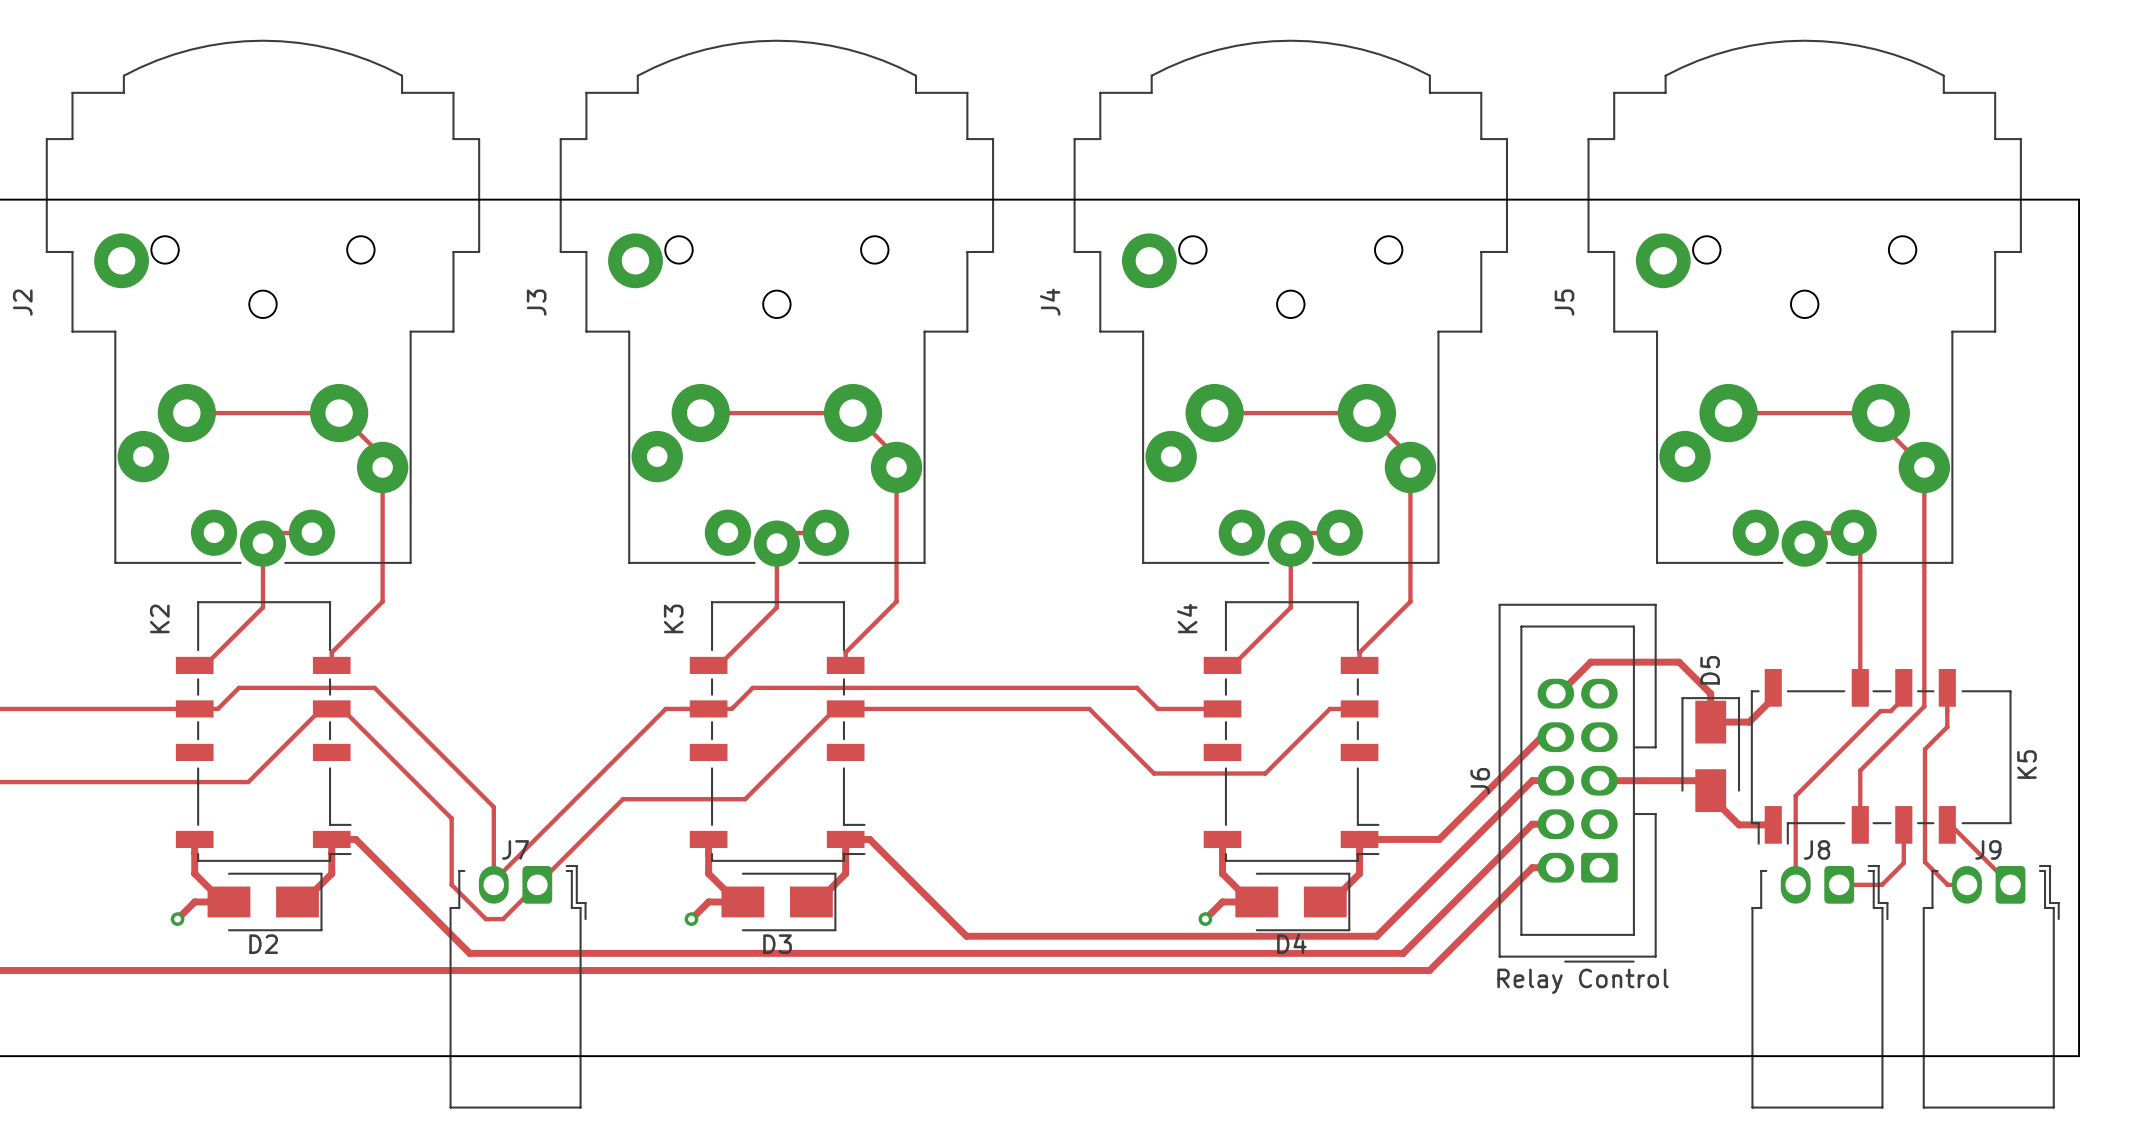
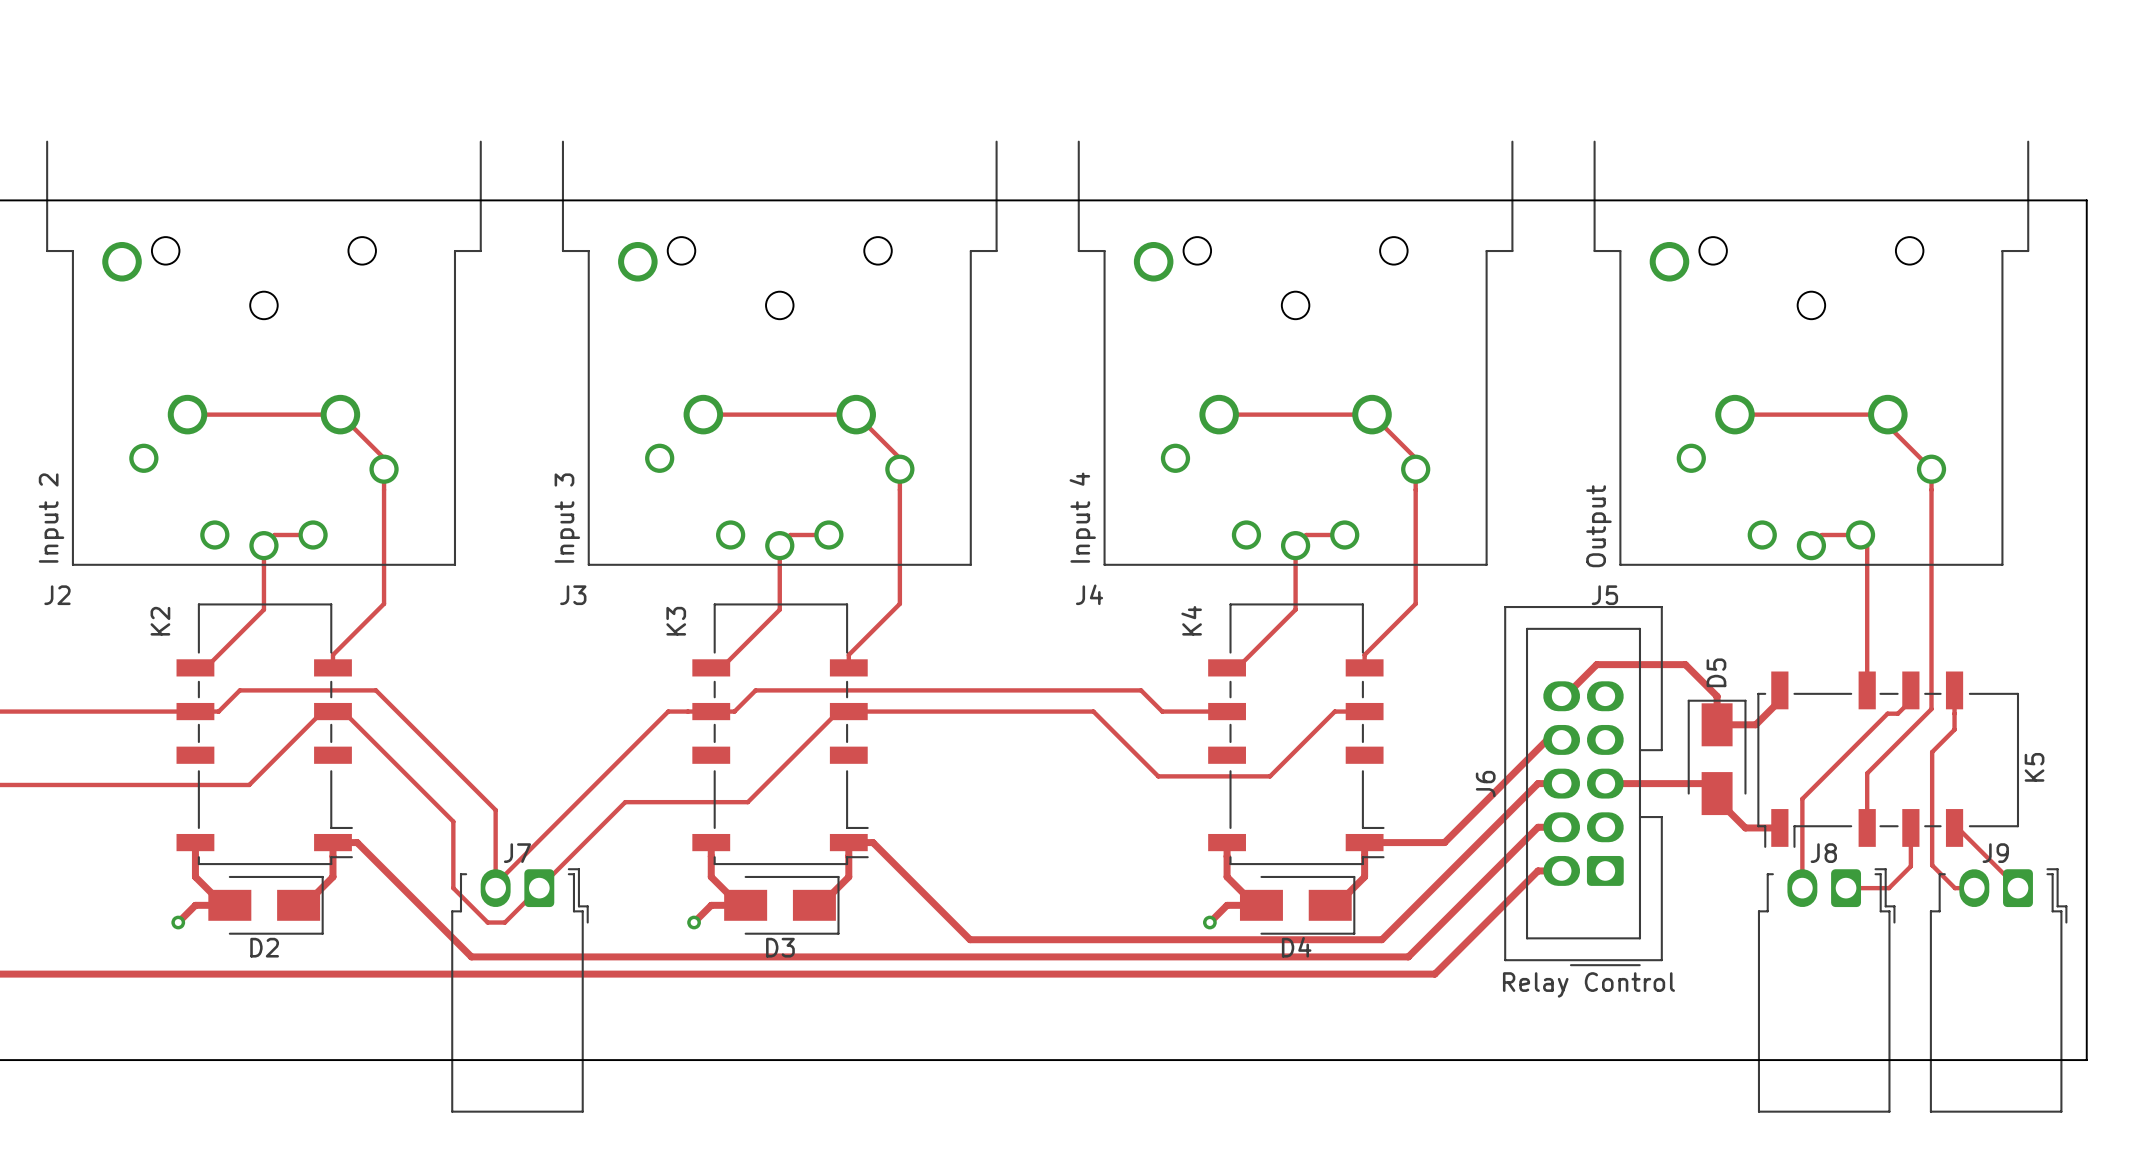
J2 footprint: [45, 39, 481, 567] -> [46, 140, 482, 566]
J3 footprint: [559, 39, 995, 567] -> [561, 140, 998, 566]
J4 footprint: [1073, 39, 1509, 567] -> [1077, 140, 1514, 566]
J5 footprint: [1587, 39, 2022, 567] -> [1593, 140, 2030, 566]
J2 name position: J2 (22, 302) -> J2 (57, 595)
J3 name position: J3 (536, 302) -> J3 (573, 595)
J4 name position: J4 (1050, 302) -> J4 (1089, 594)
J5 name position: J5 (1564, 302) -> J5 (1604, 595)

